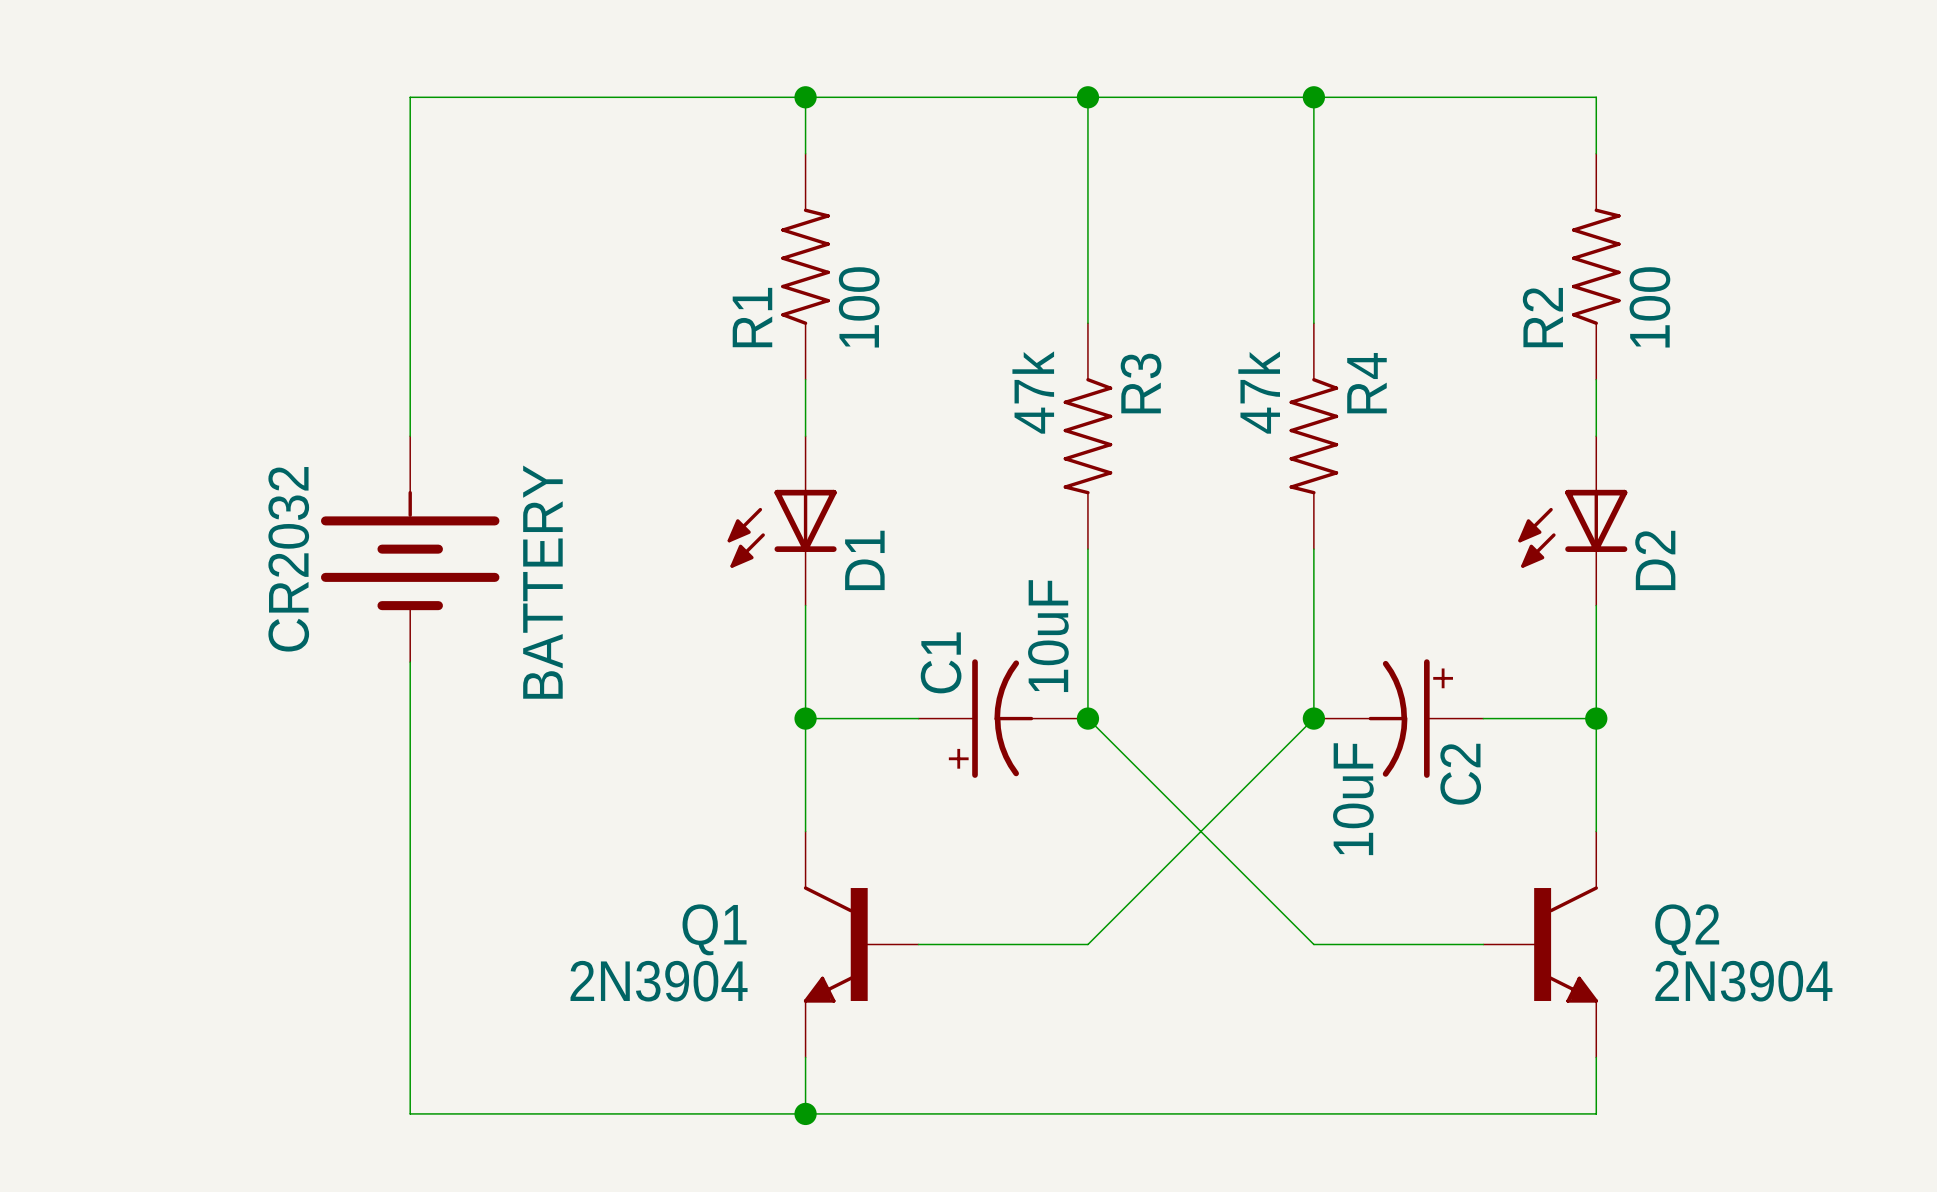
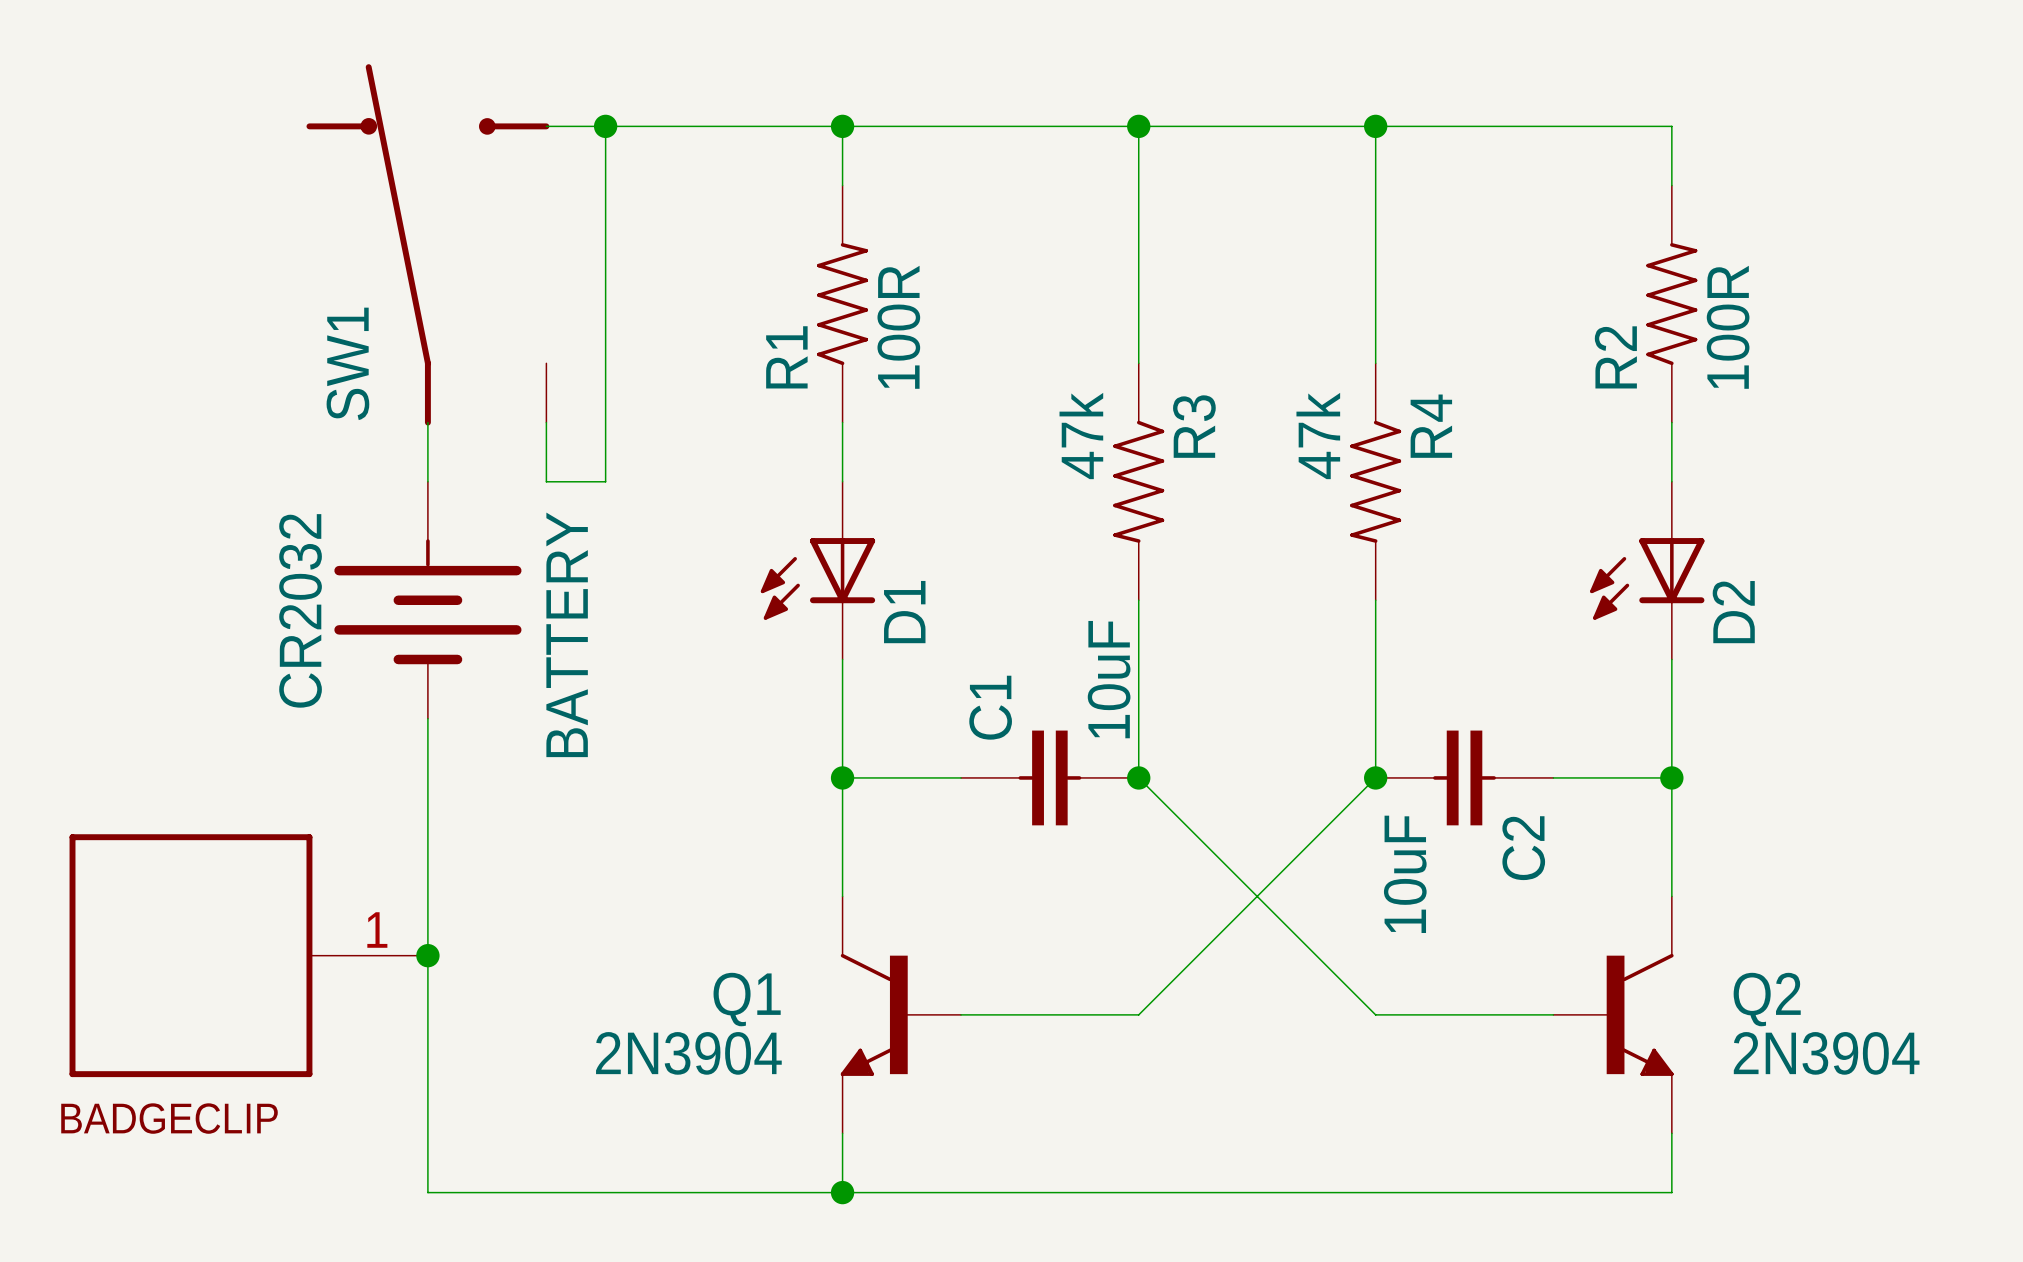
wire: (523, 97) (410, 97) (410, 379) -> none
wire: none -> (605, 126) (605, 481) (546, 481) (546, 422)
junction: none -> (605, 126)
SW1: none -> (427, 244)
R1 value: 100 (859, 307) -> 100R (898, 327)
R2 value: 100 (1649, 307) -> 100R (1728, 327)
C1 symbol: [918, 659, 1088, 778] -> [961, 730, 1139, 826]
C2 symbol: [1313, 659, 1484, 778] -> [1375, 730, 1554, 826]
BADGECLIP: none -> (248, 955)
junction: none -> (427, 955)

